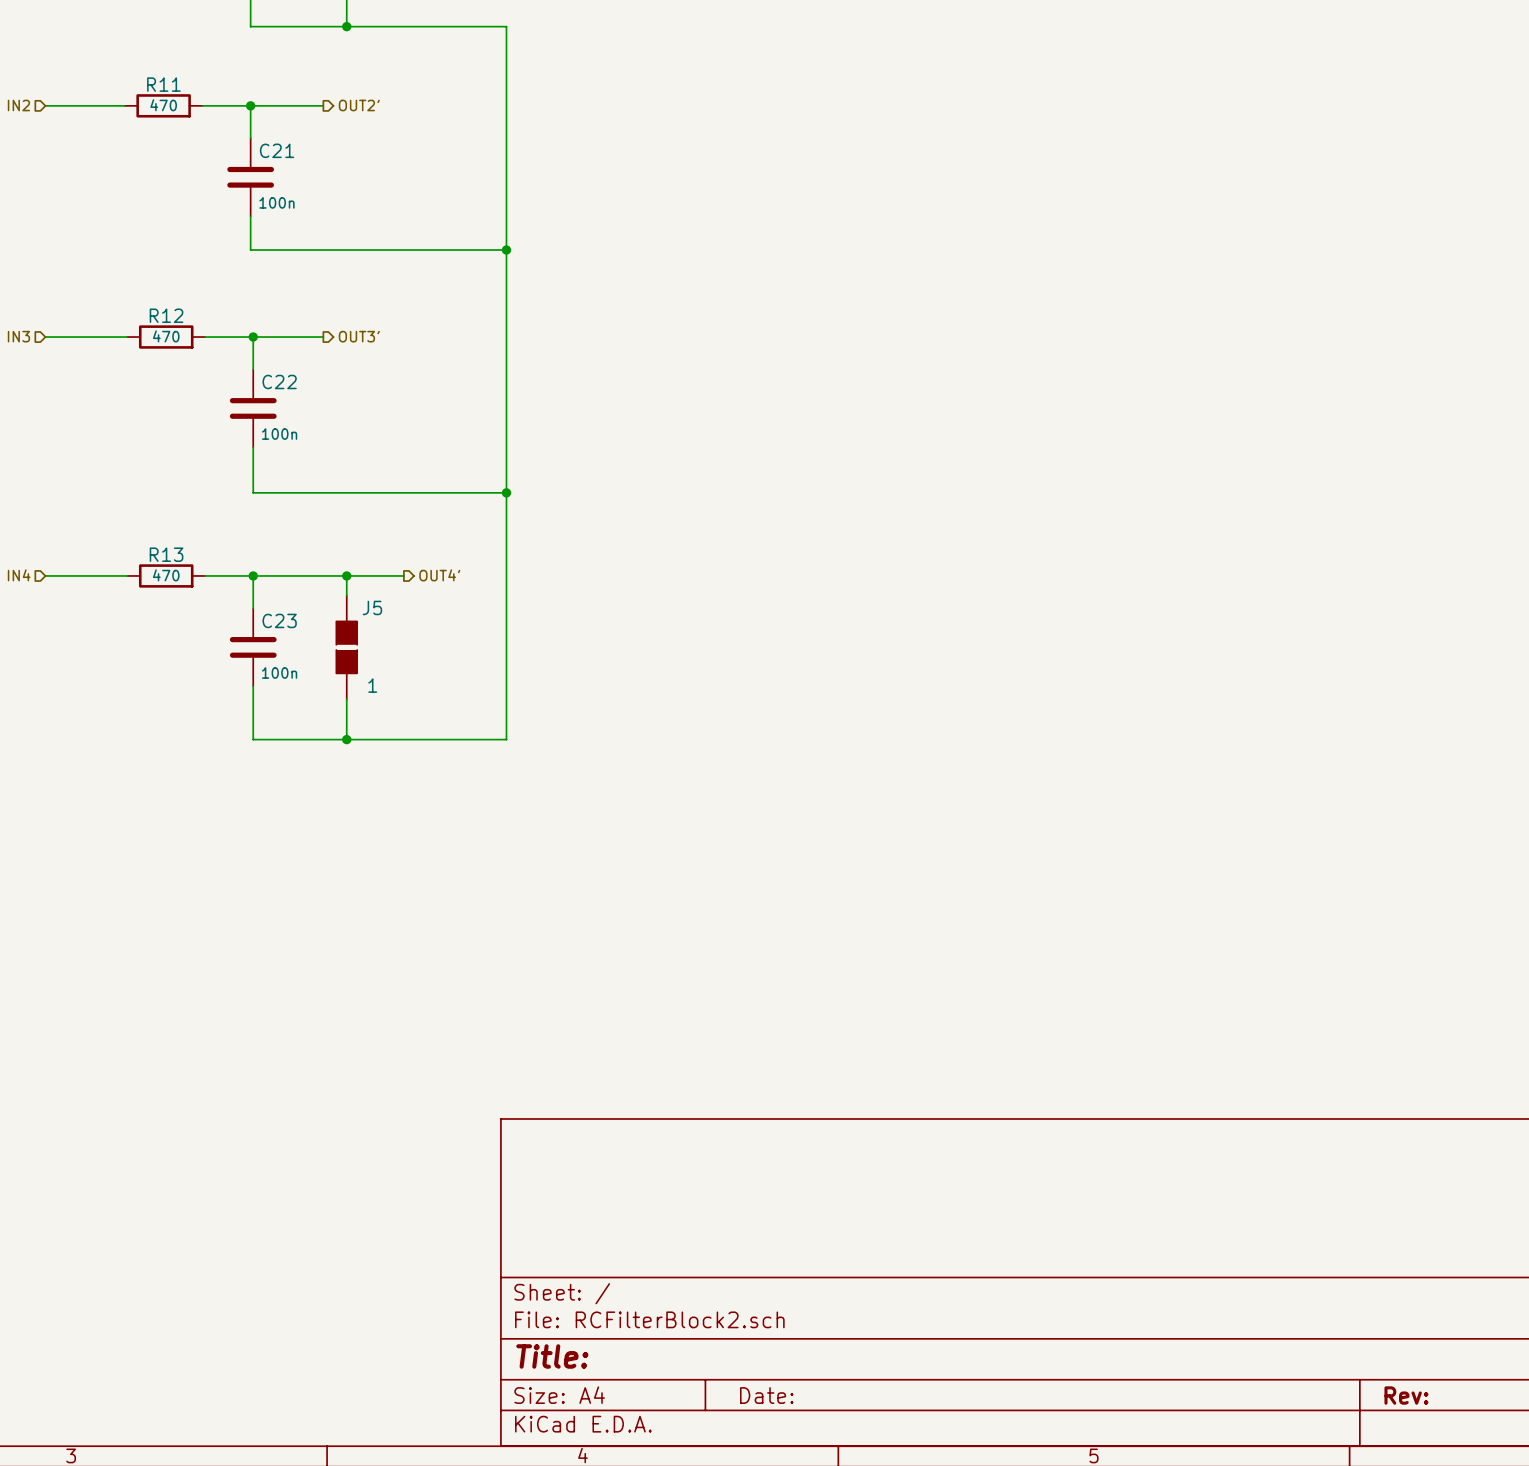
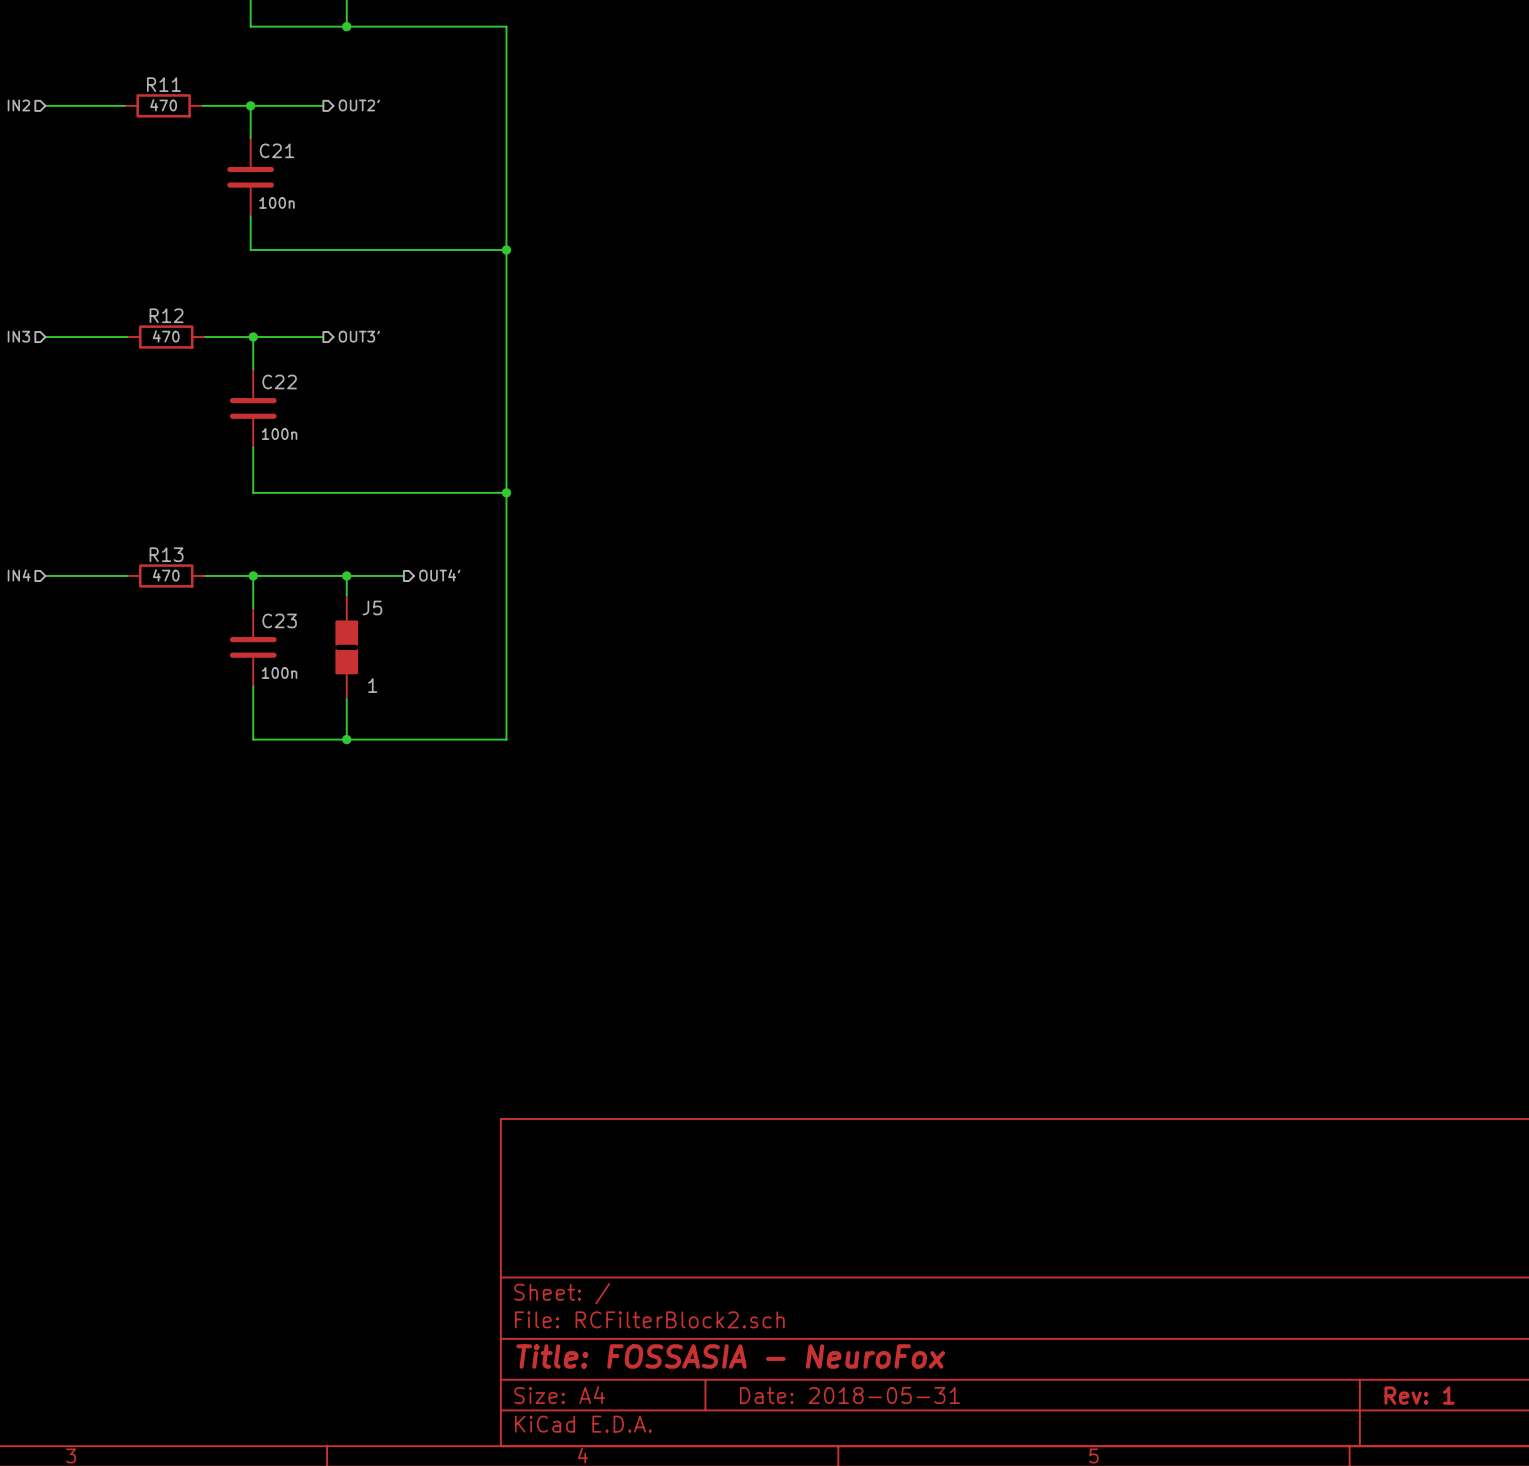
title block: Title: (552, 1356) -> Title: FOSSASIA - NeuroFox (730, 1356)
title block: Date: (766, 1395) -> Date: 2018-05-31 (849, 1395)
title block: Rev: (1406, 1395) -> Rev: 1 (1419, 1395)

